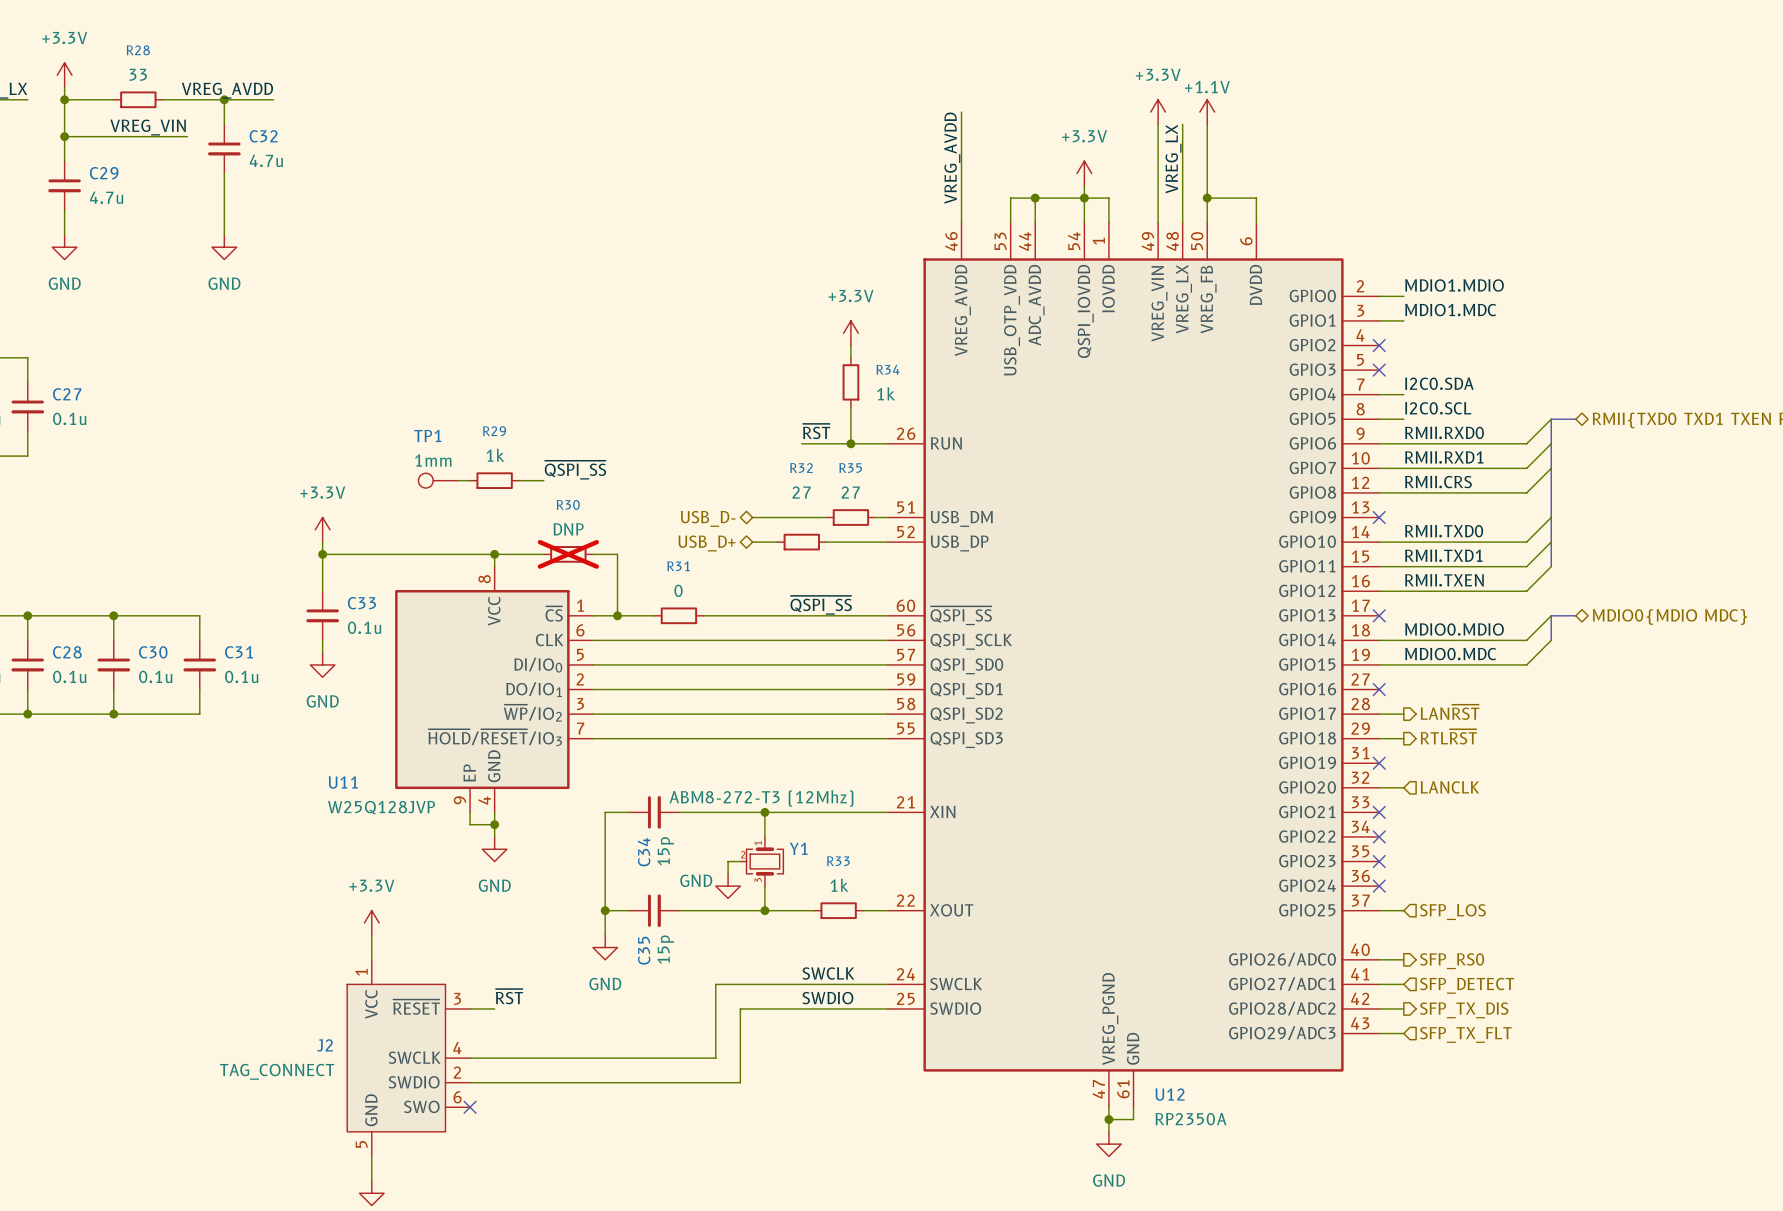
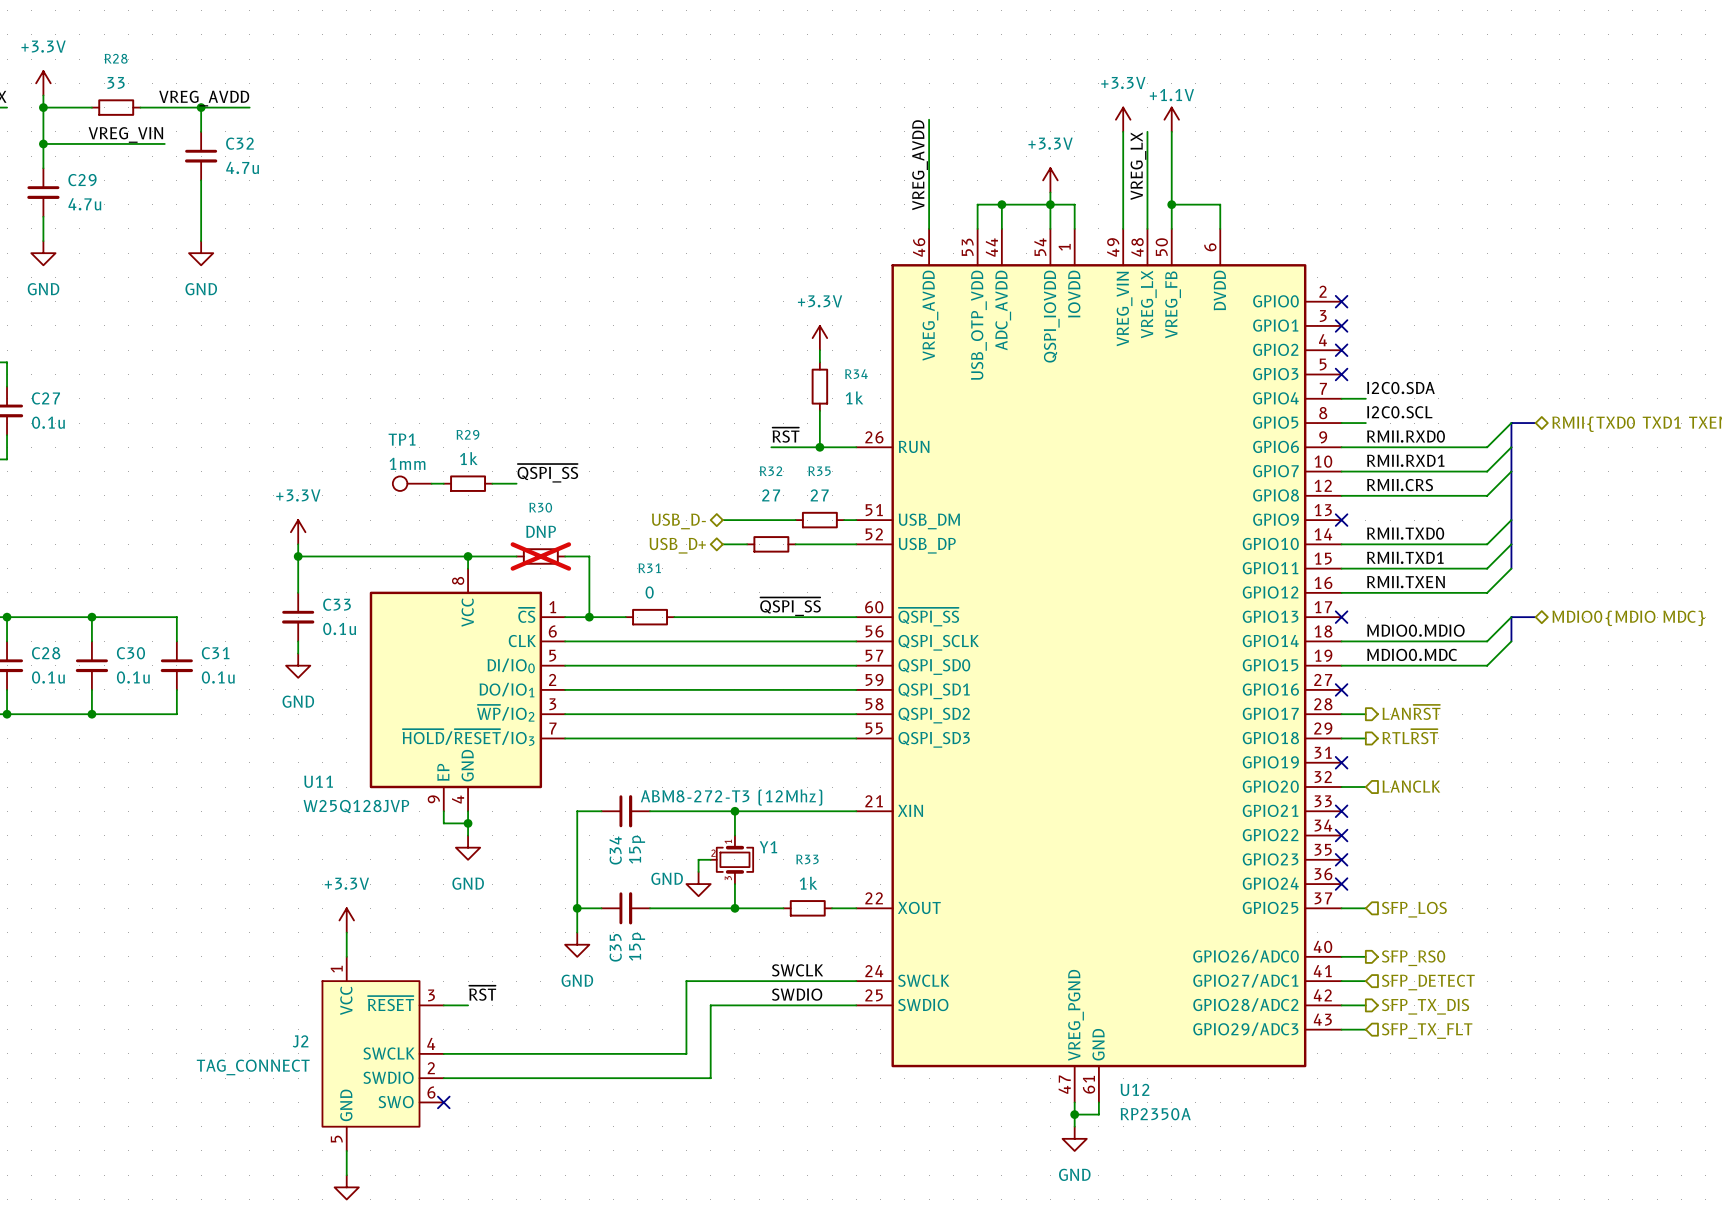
label: MDIO1.MDIO (1454, 285) -> none
wire: (1379, 296) (1403, 296) -> none
no-connect mark: none -> (1341, 301)
label: MDIO1.MDC (1450, 310) -> none
wire: (1379, 320) (1403, 320) -> none
no-connect mark: none -> (1341, 325)

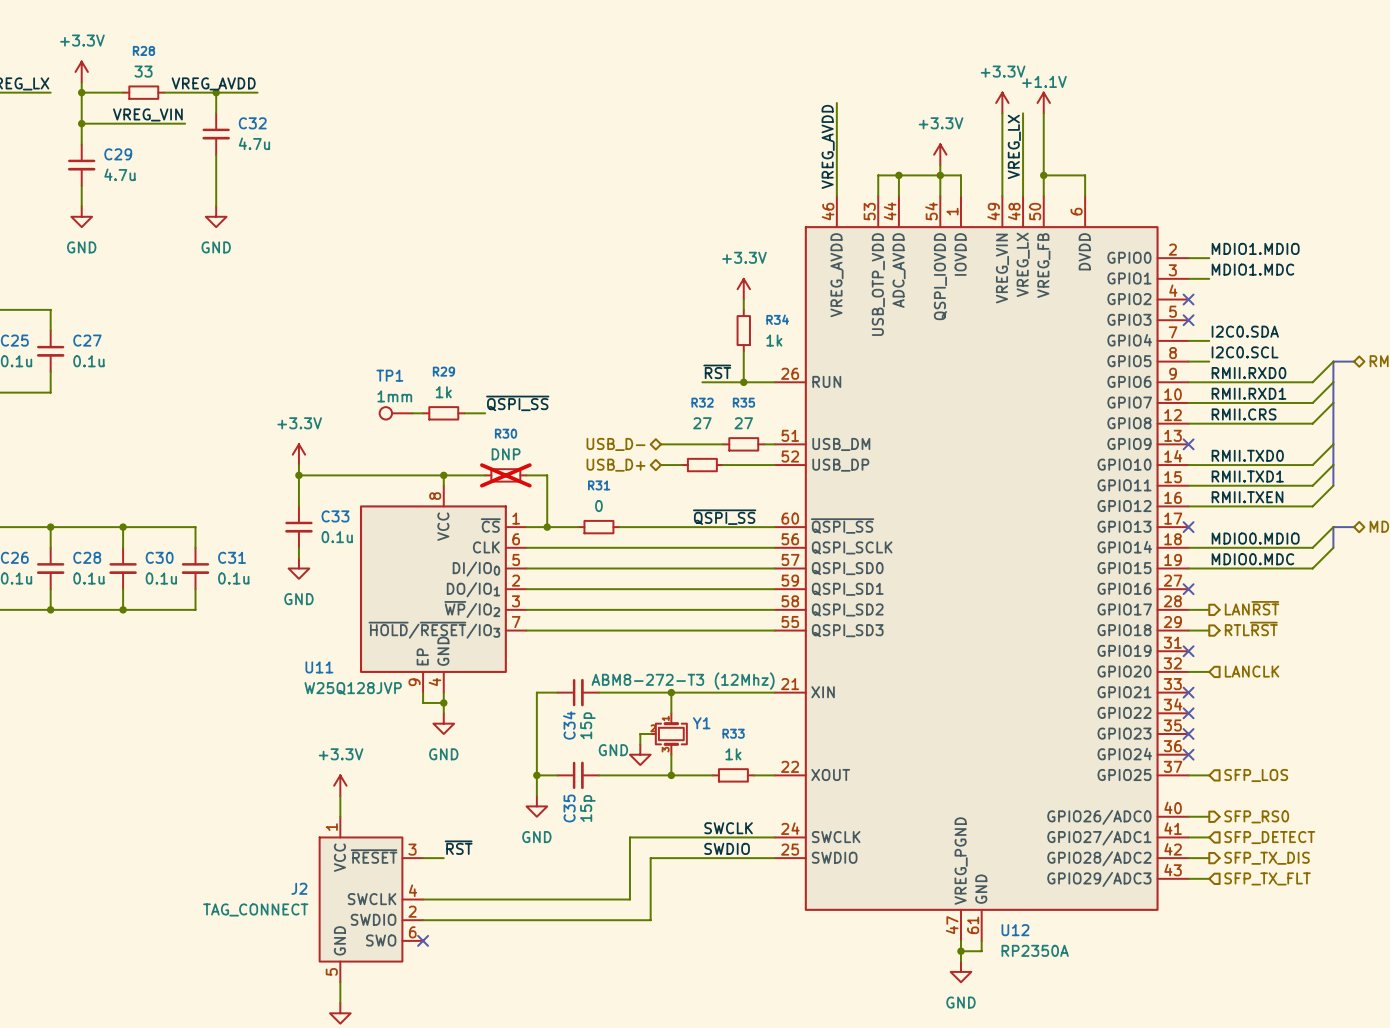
label: none -> MDIO1.MDIO (1255, 248)
wire: none -> (1188, 258) (1209, 258)
no-connect mark: (1341, 301) -> none
label: none -> MDIO1.MDC (1252, 269)
wire: none -> (1188, 278) (1209, 278)
no-connect mark: (1341, 325) -> none

